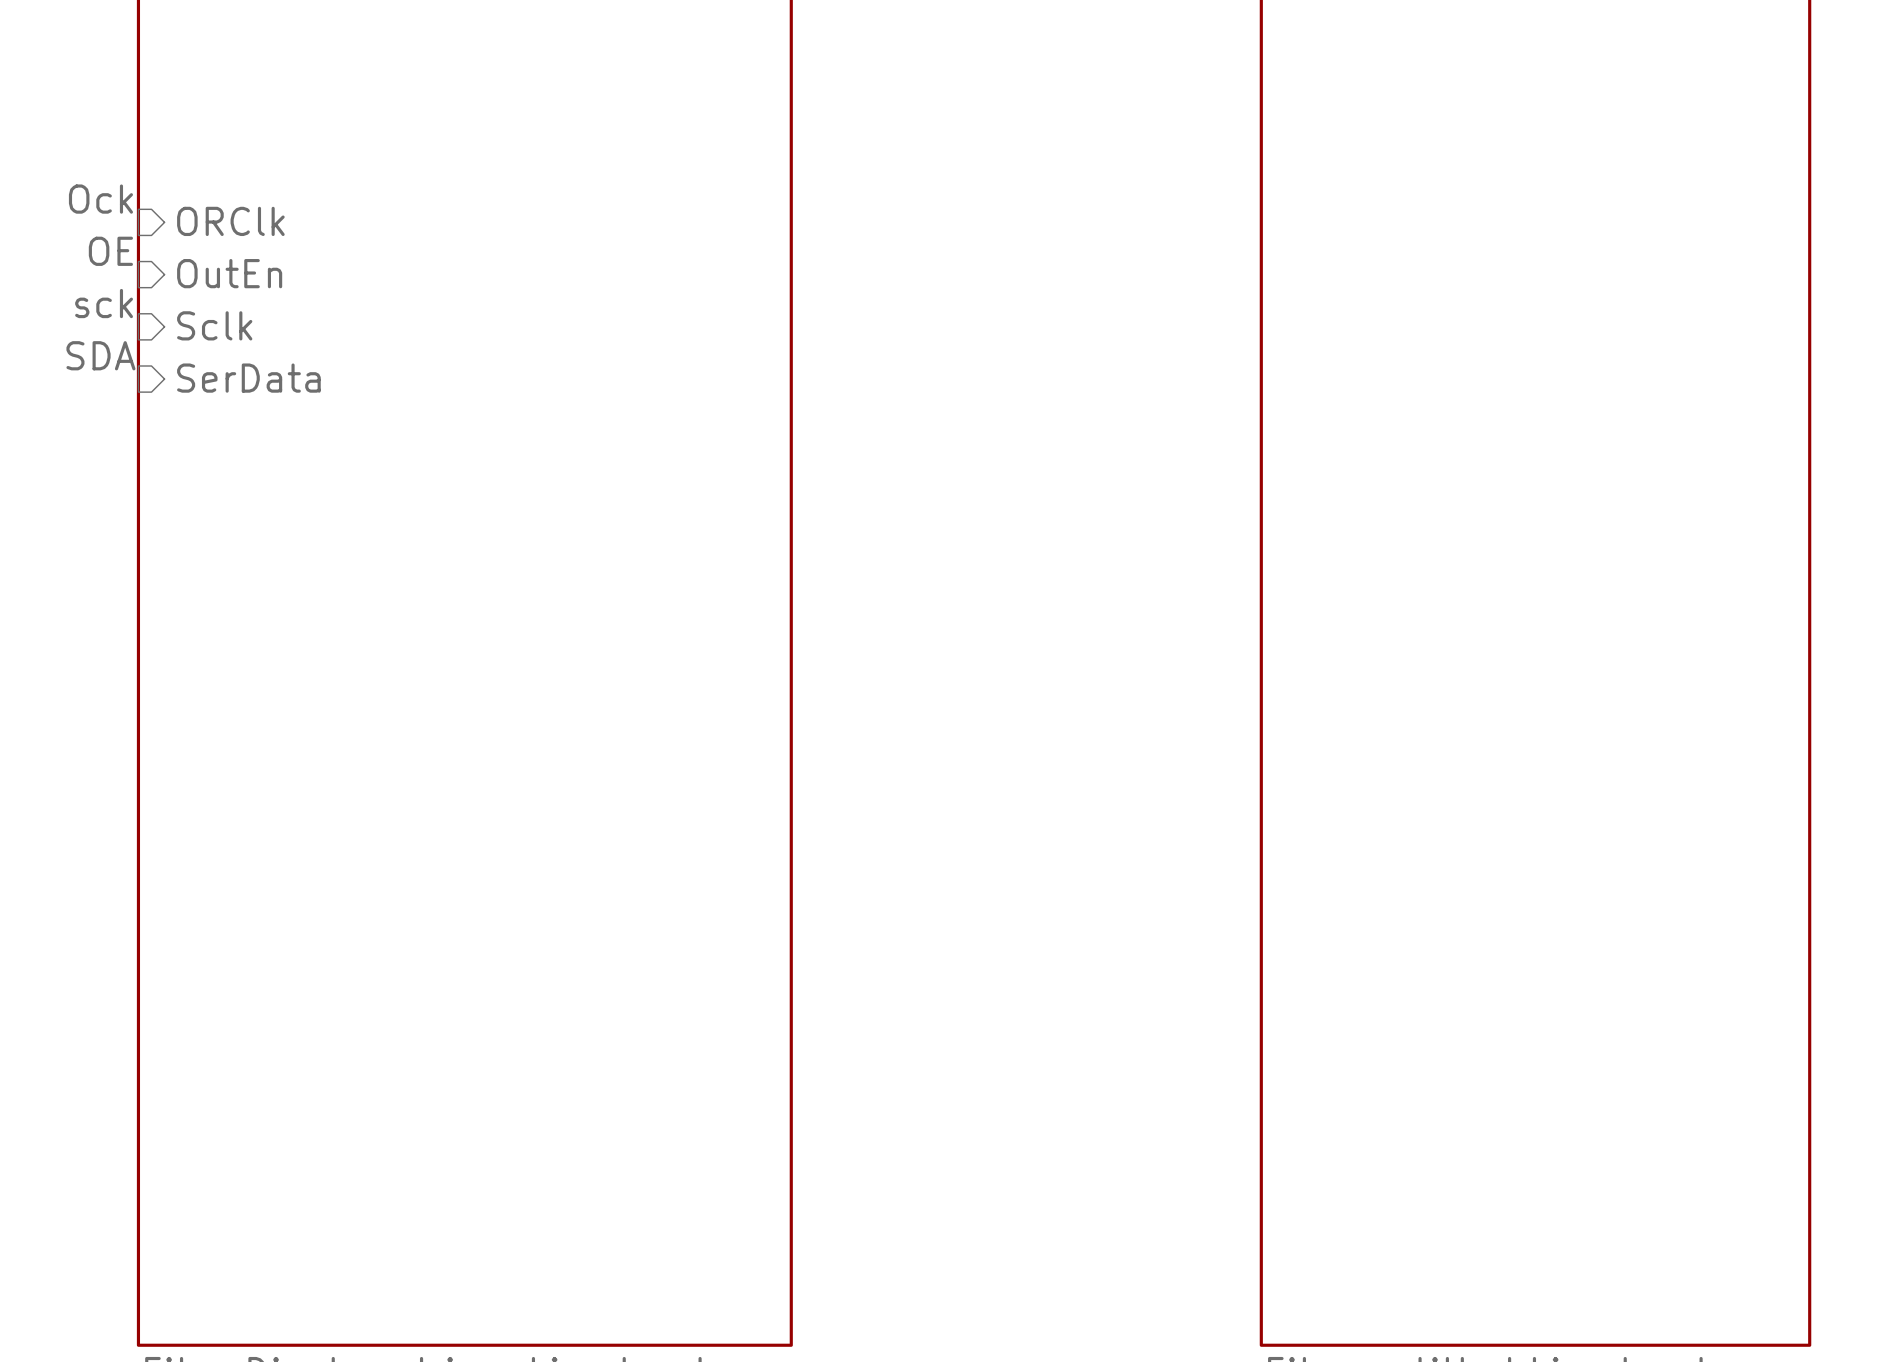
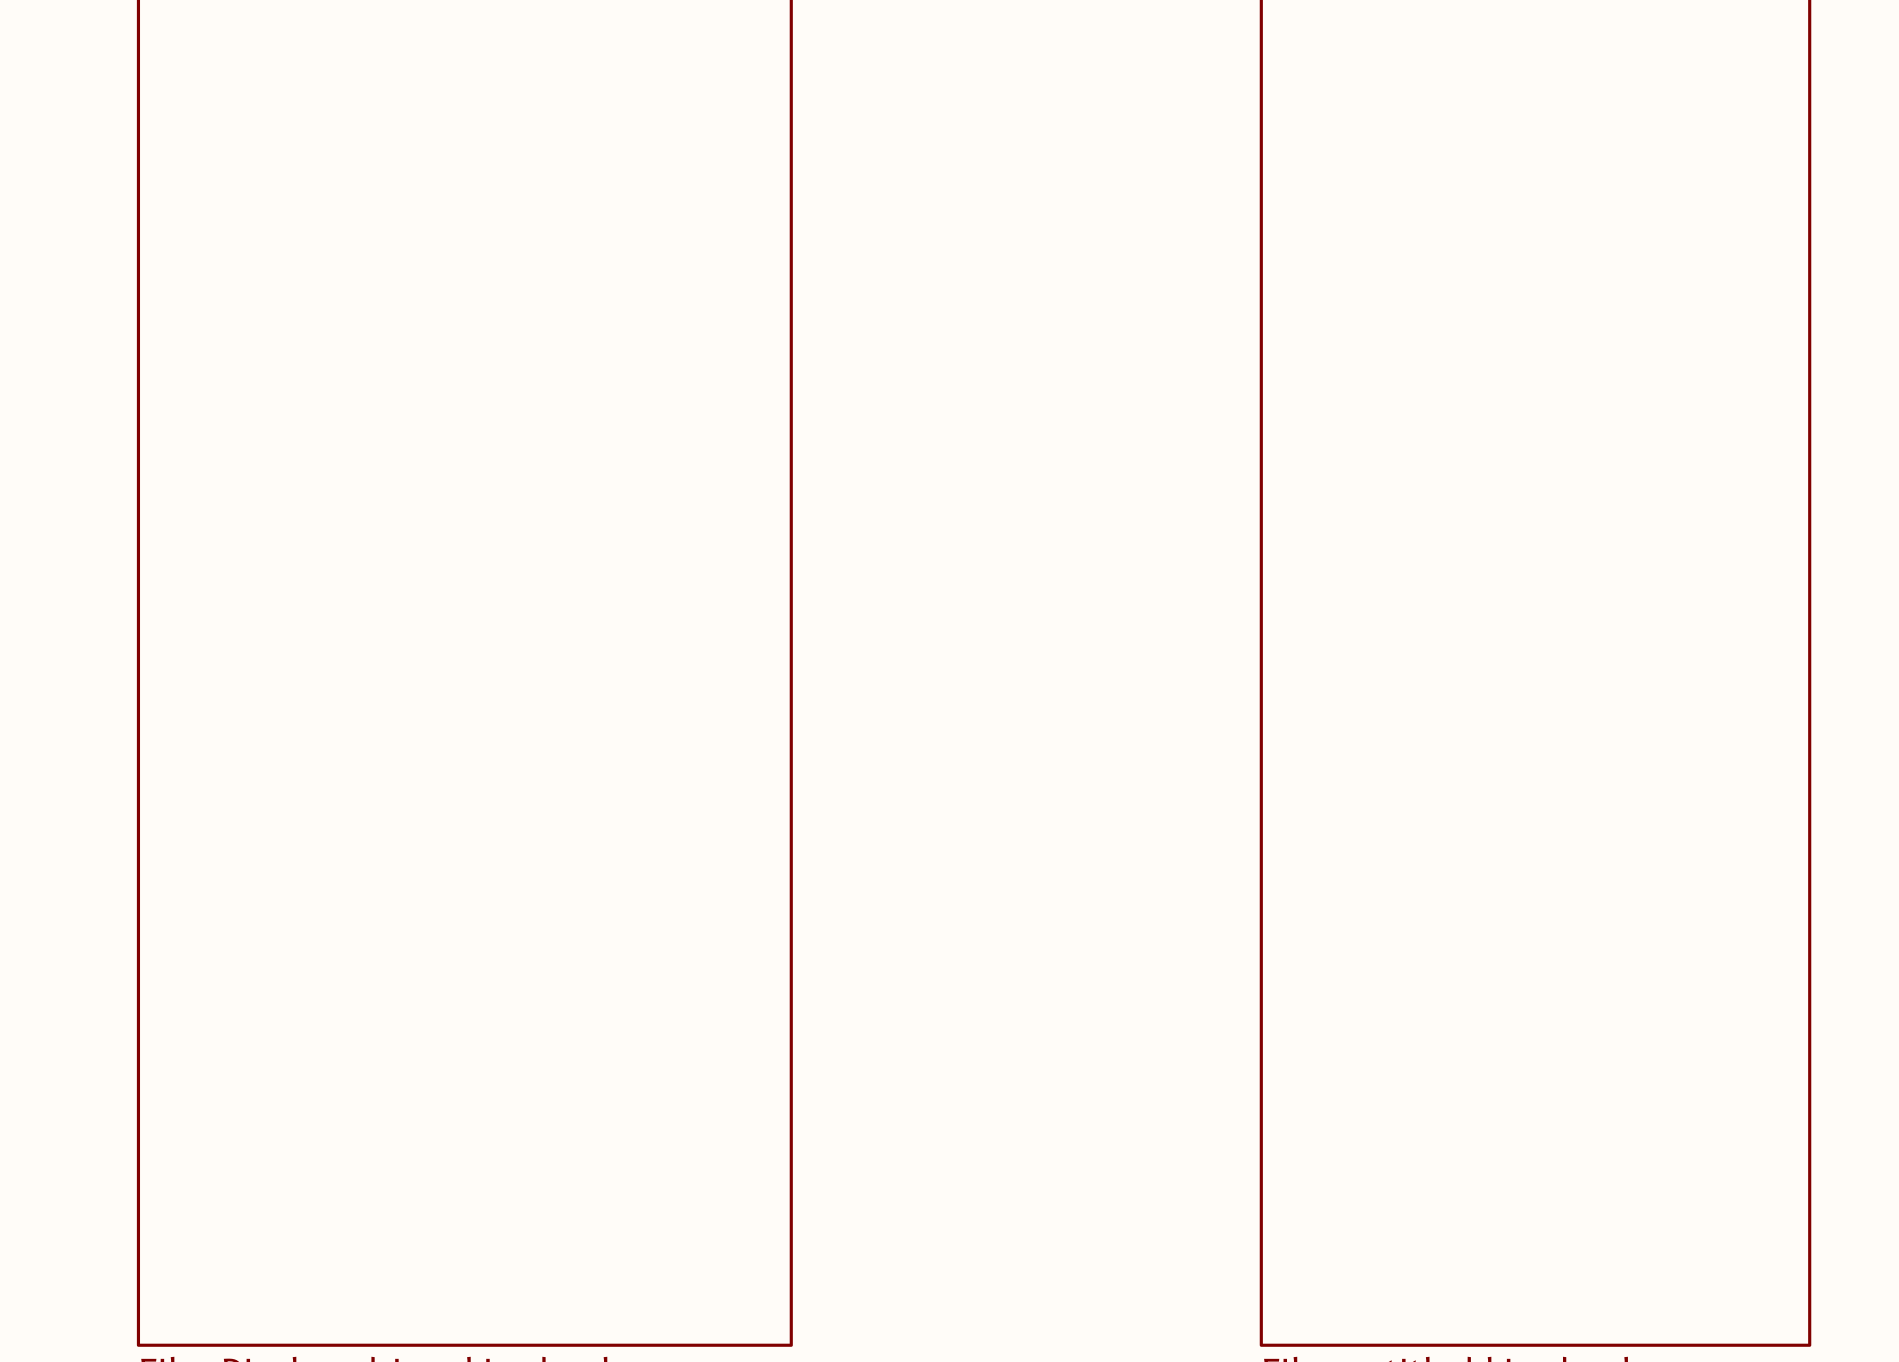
label: Ock (100, 199) -> none
sheet pin: ORClk (230, 221) -> none
label: OE (110, 251) -> none
sheet pin: OutEn (229, 273) -> none
label: sck (104, 303) -> none
sheet pin: Sclk (214, 325) -> none
label: SDA (100, 355) -> none
sheet pin: SerData (248, 378) -> none

